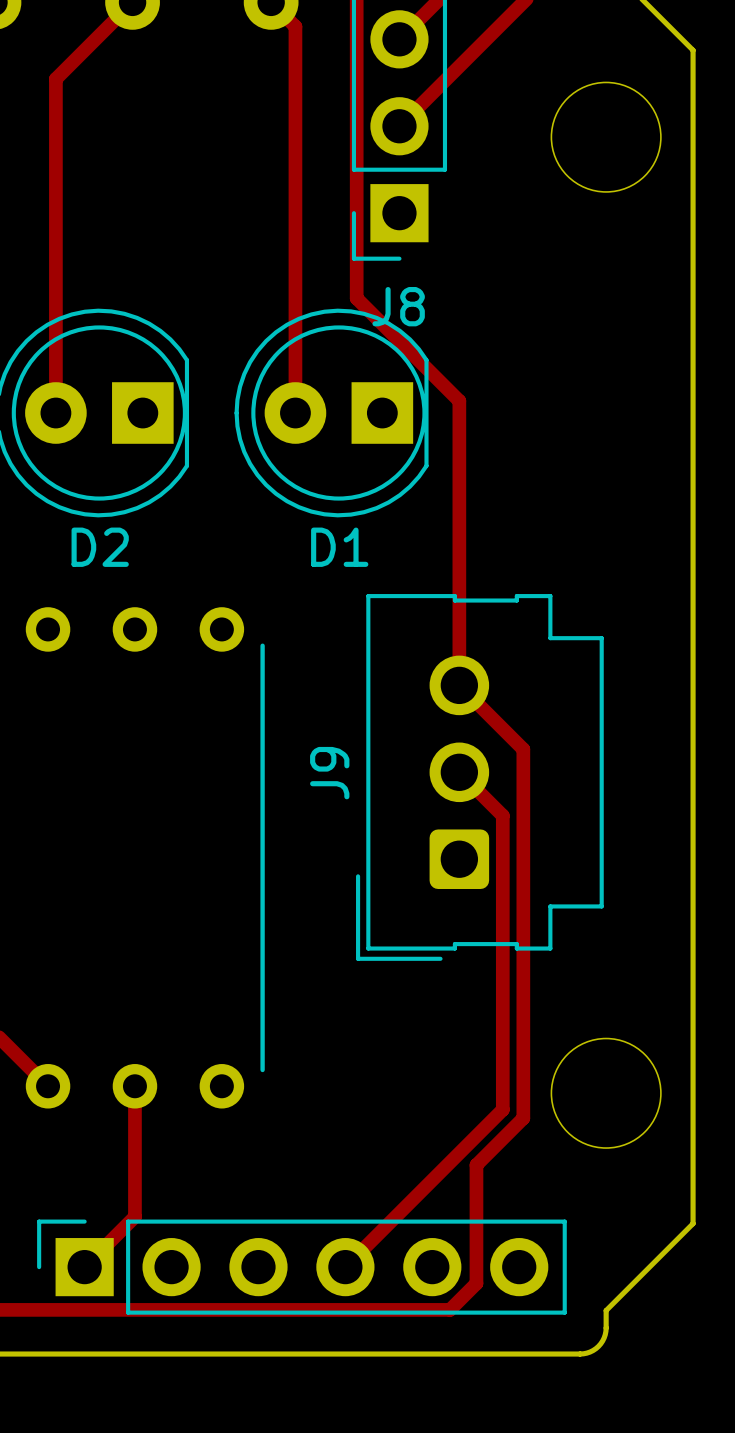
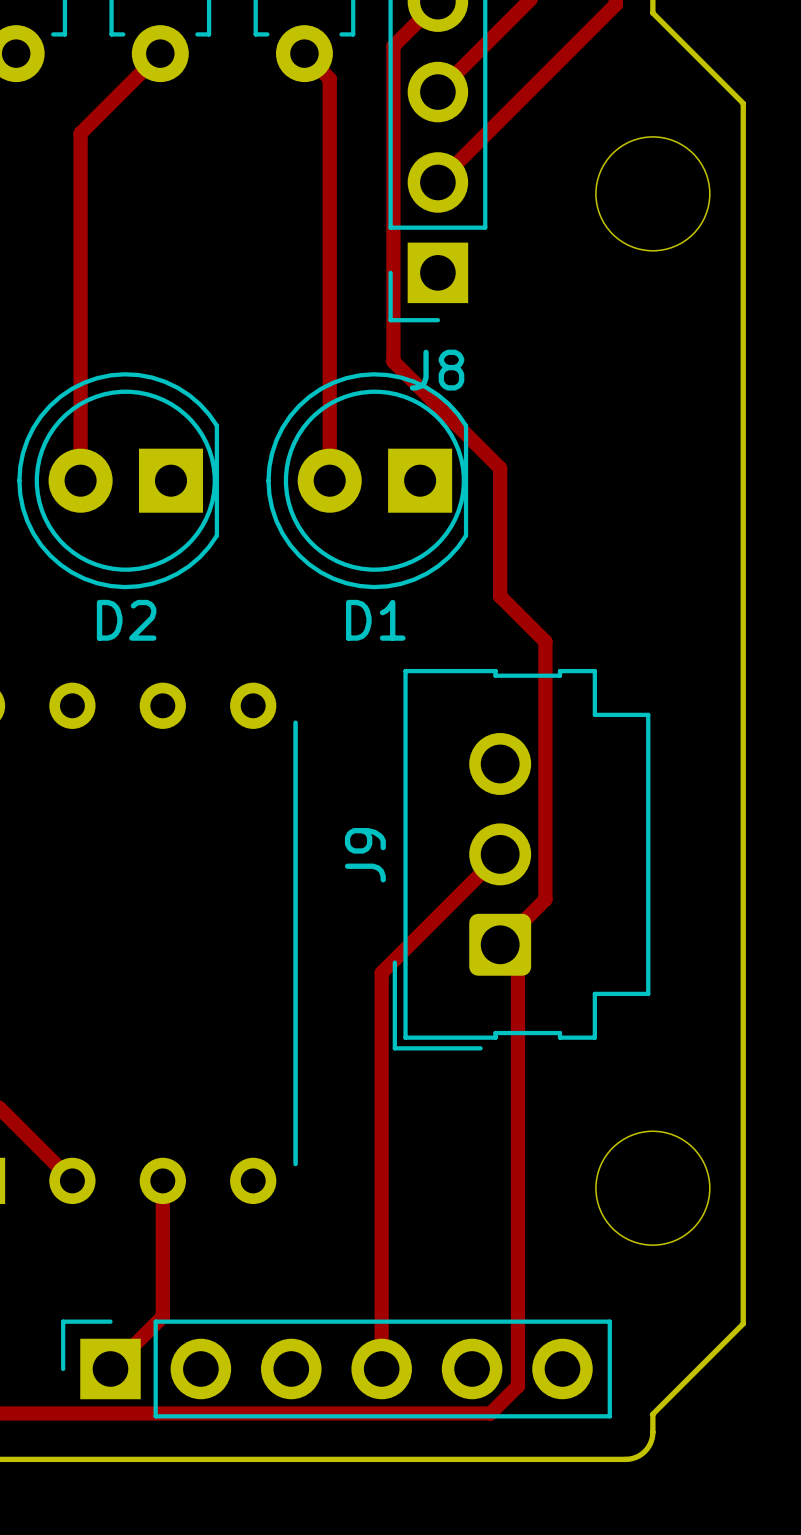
track: (459, 524) (459, 685) (523, 749) (523, 1118) (476, 1165) -> (500, 596) (545, 641) (545, 899) (500, 944)
track: (459, 772) (502, 815) (502, 1109) (345, 1267) -> (500, 854) (381, 972) (381, 1368)
track: none -> (517, 962) (517, 1262)

